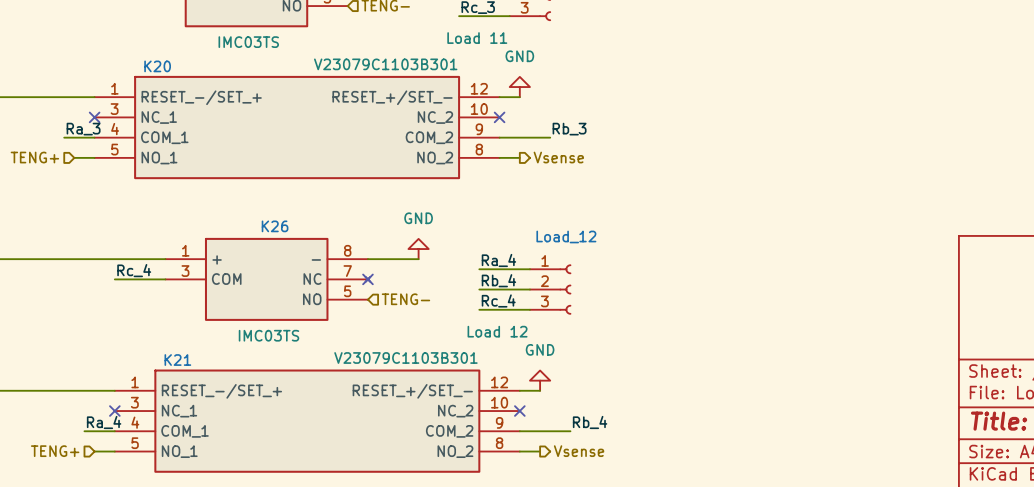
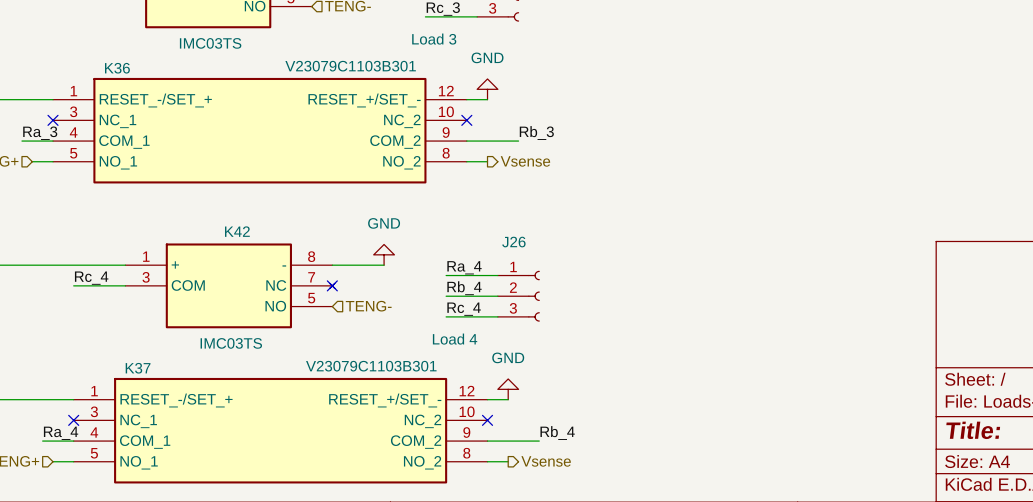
part value: Load 11 (477, 38) -> Load 3 (434, 39)
K20 name: K20 (157, 66) -> K36 (117, 68)
K26 name: K26 (275, 226) -> K42 (237, 231)
Load_12 name: Load_12 (566, 236) -> J26 (513, 242)
Load_12 value: Load 12 (497, 331) -> Load 4 (455, 339)
K21 name: K21 (177, 360) -> K37 (138, 368)

